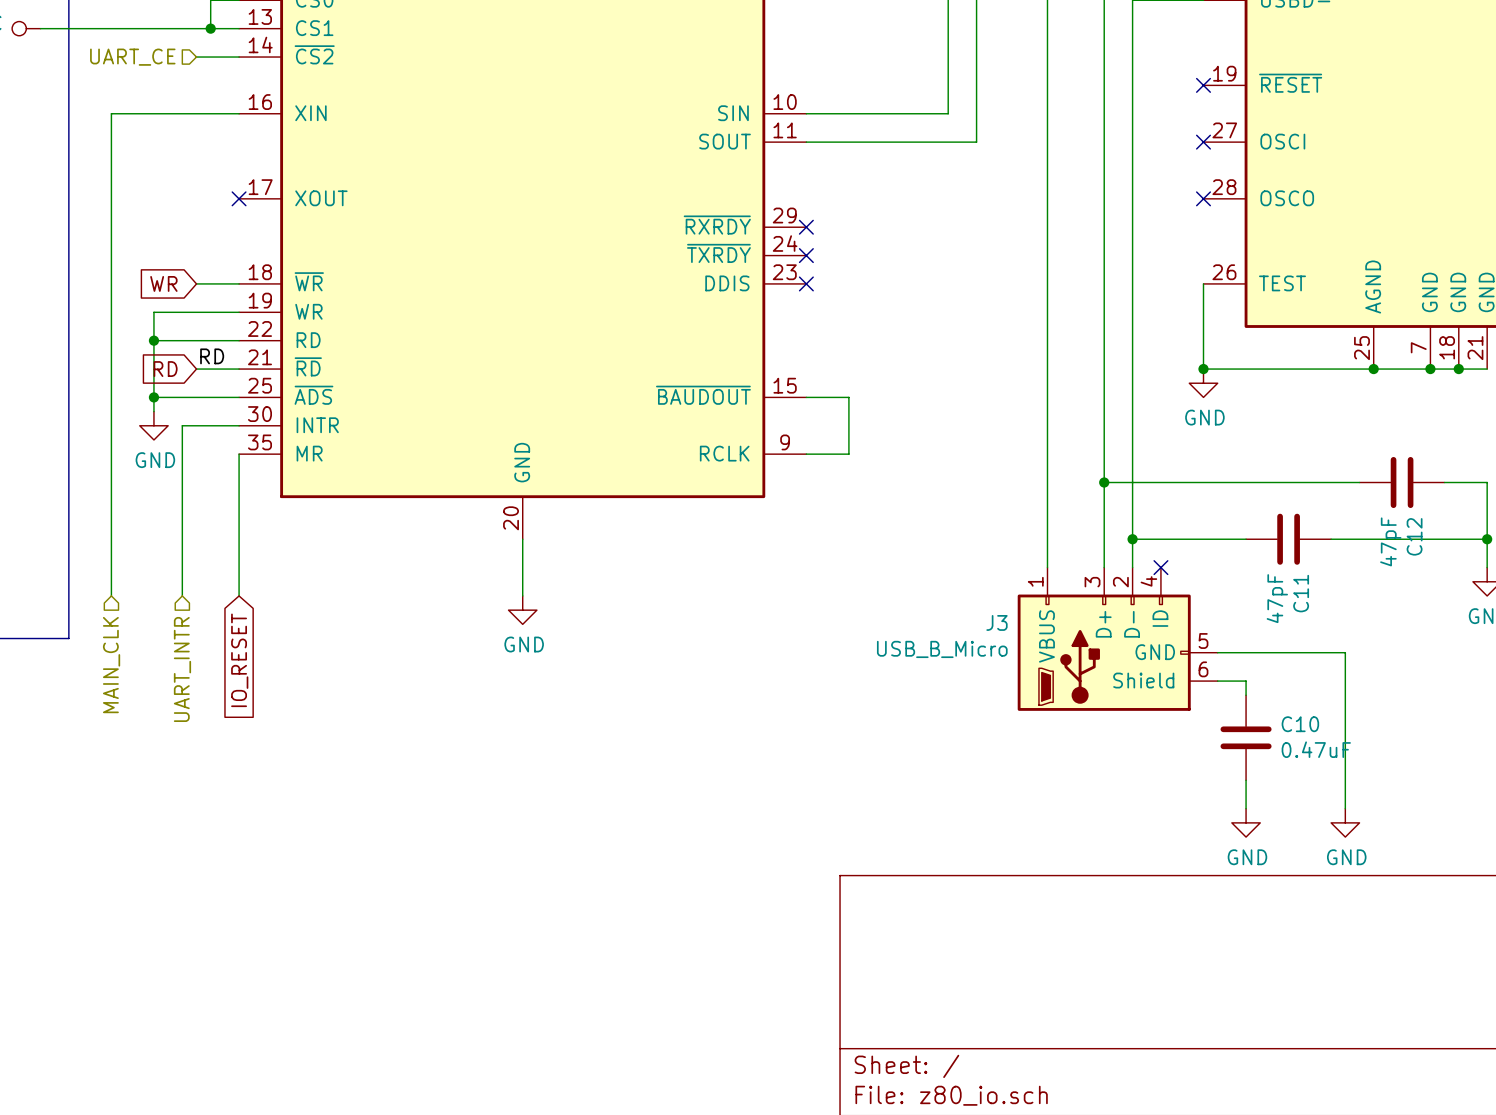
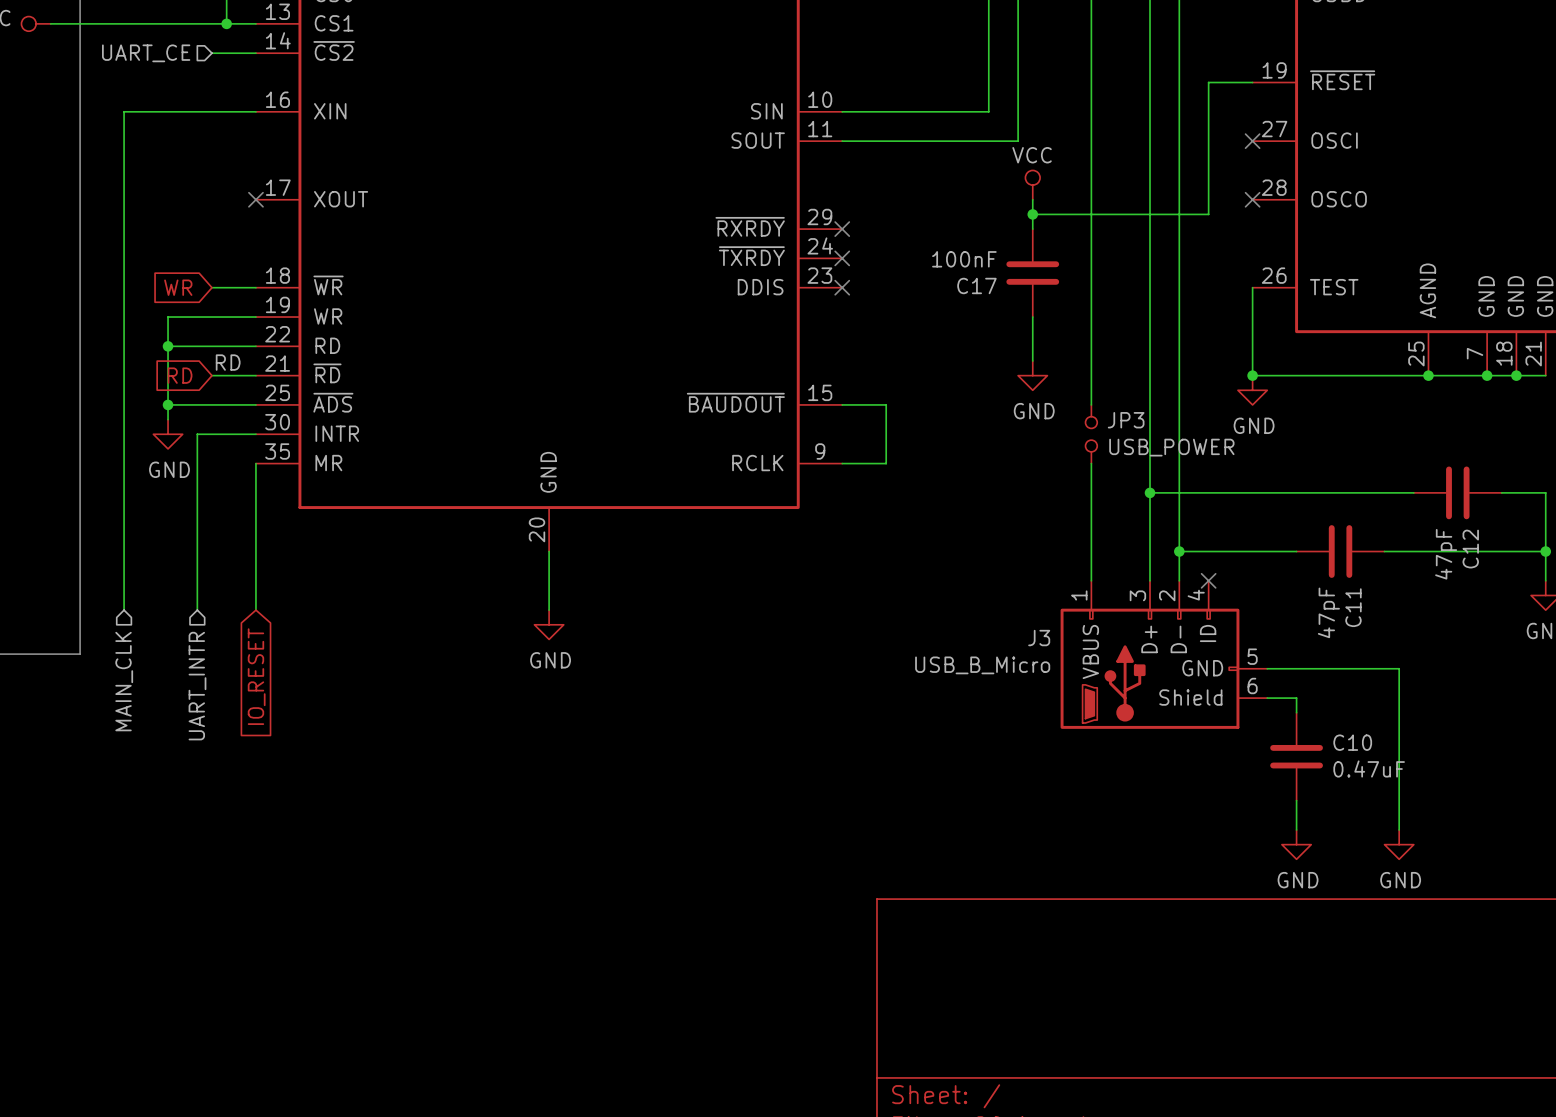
wire: none -> (1252, 82) (1208, 82) (1208, 214) (1032, 214)
no-connect mark: (1203, 85) -> none
power symbol: none -> VCC (1032, 185)
wire: none -> (1032, 199) (1032, 229)
junction: none -> (1032, 214)
C17: none -> 100nF (1032, 273)
wire: none -> (1032, 317) (1032, 360)
power symbol: none -> GND (1032, 375)
wire: (1047, 397) (1047, 454) -> none
JP3: none -> USB_POWER (1091, 434)

